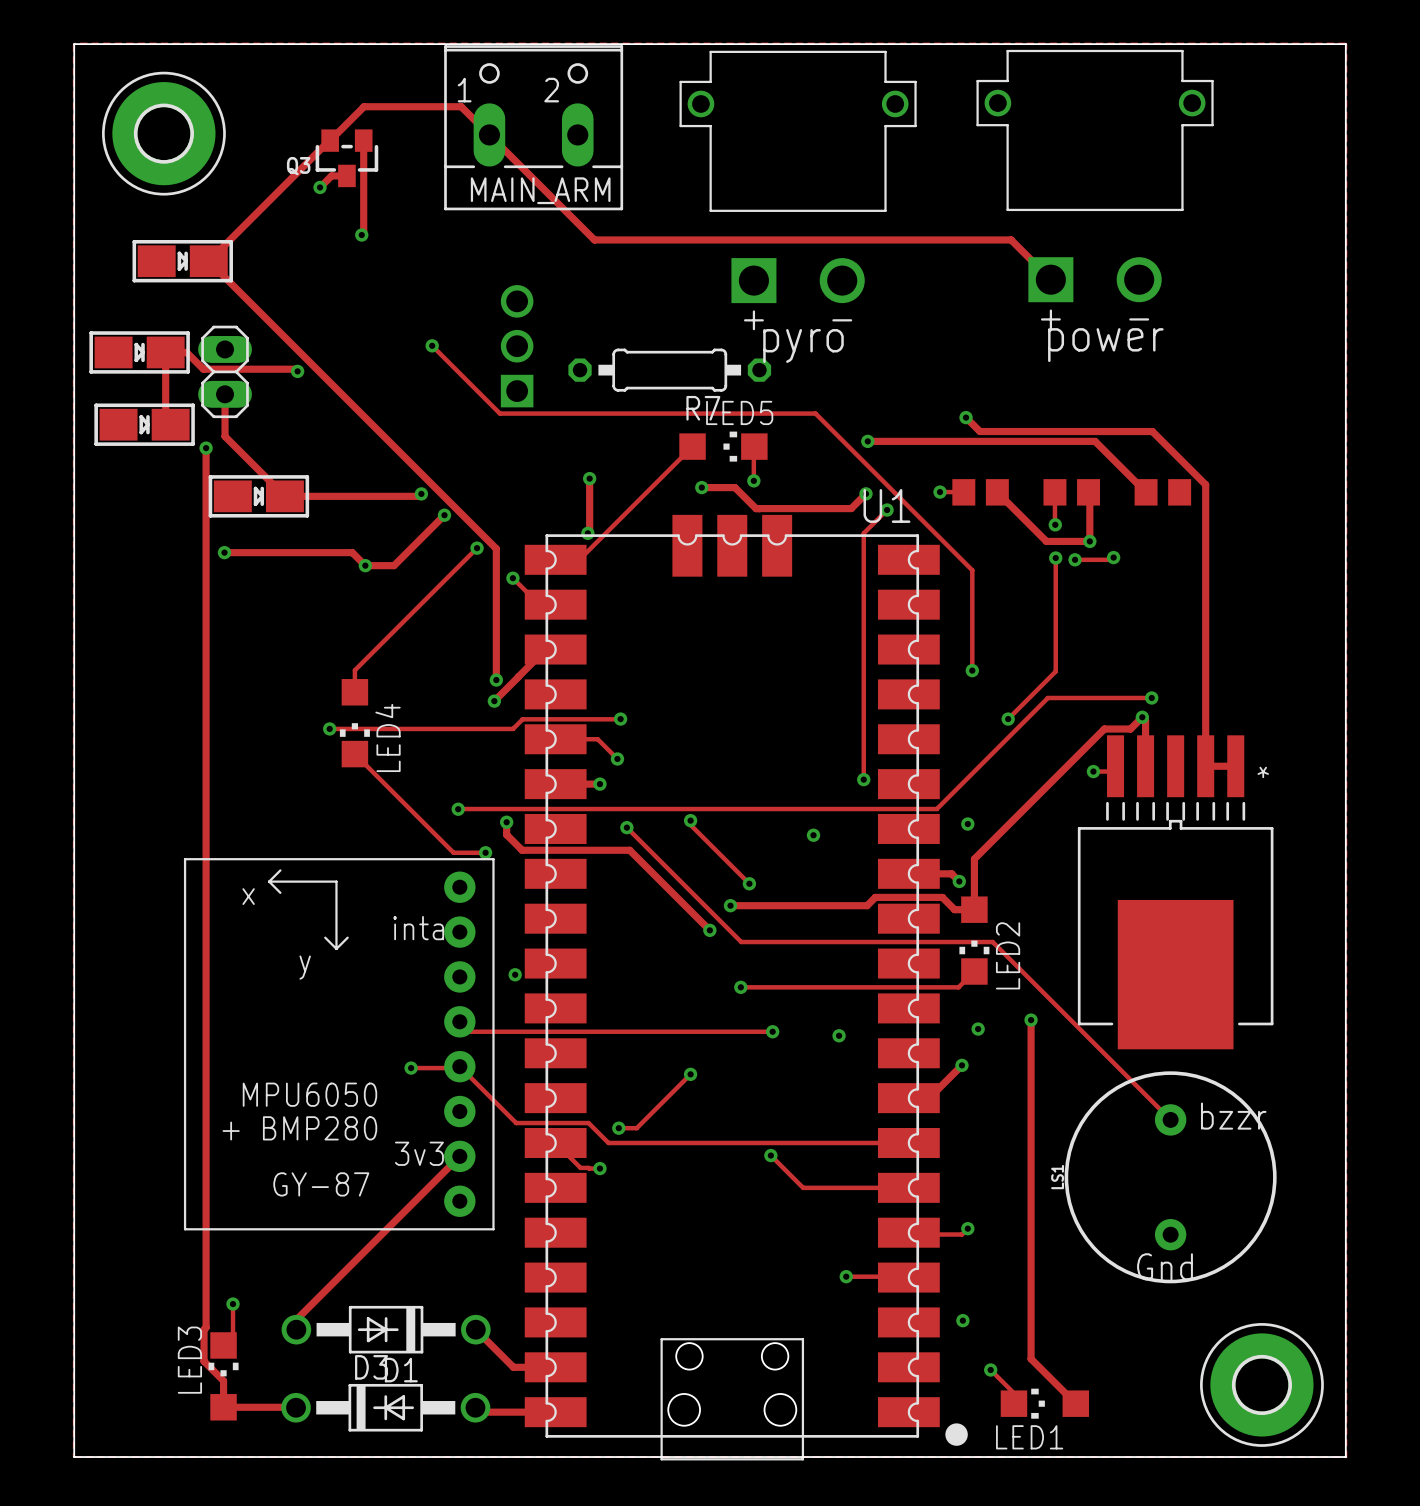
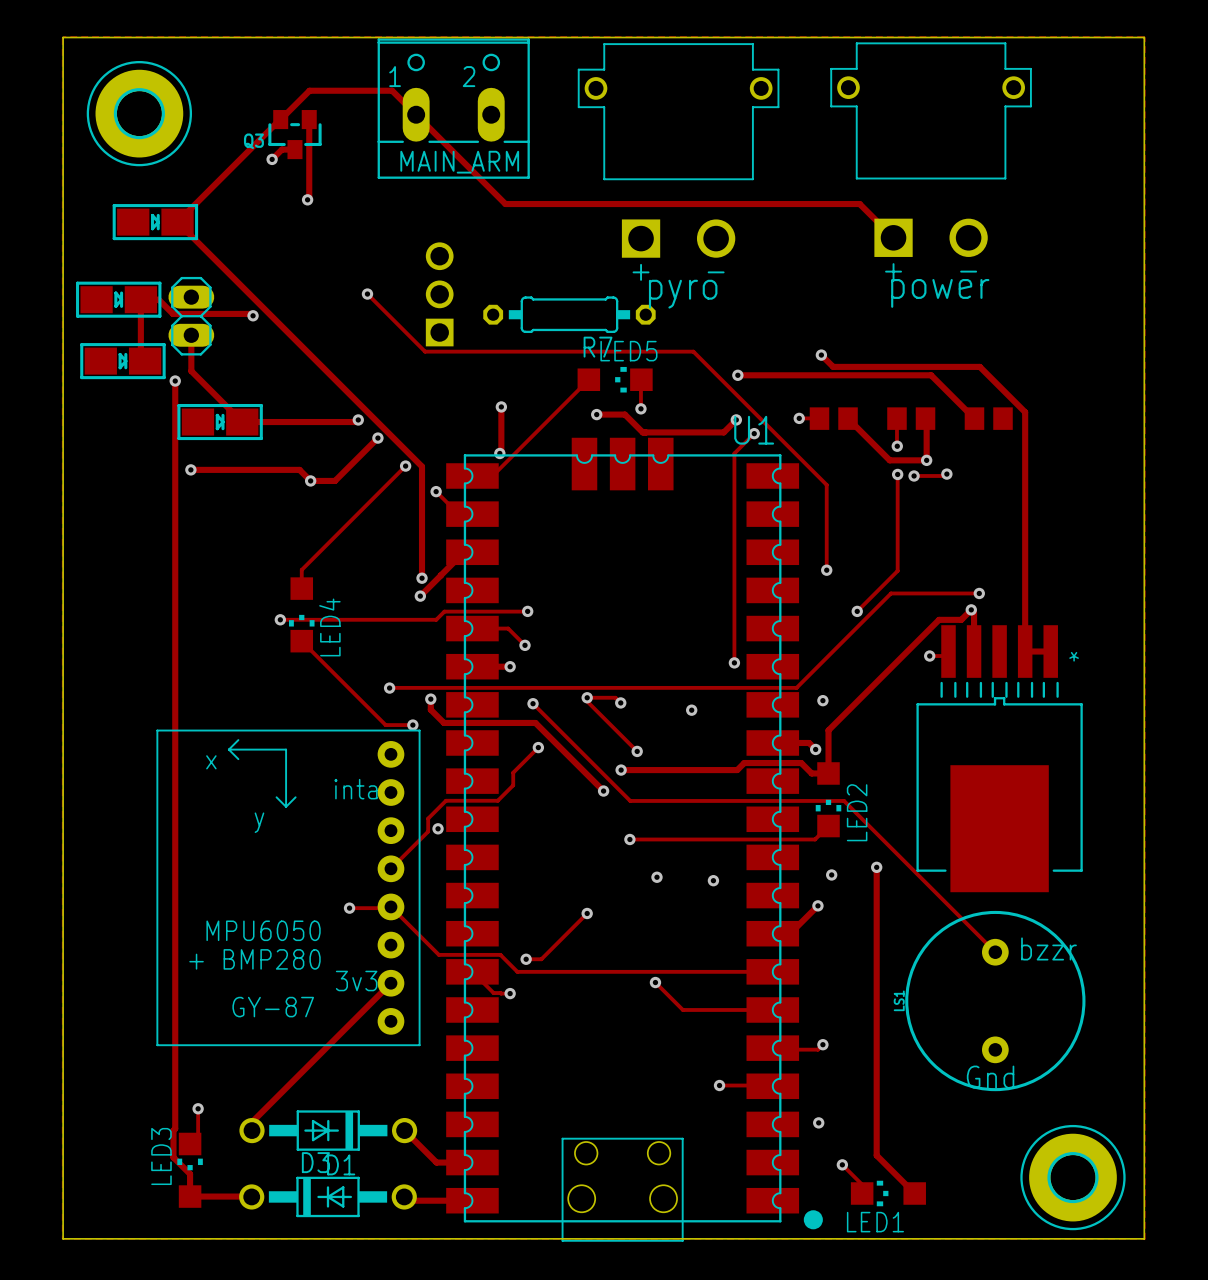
track: none -> (587, 697) (615, 697) (620, 702)
via: none -> (620, 702)
via: none -> (538, 747)
track: (459, 1021) (469, 1031) (772, 1031) -> (390, 868) (428, 831) (428, 818) (445, 800) (497, 800) (513, 785) (513, 772) (538, 747)

